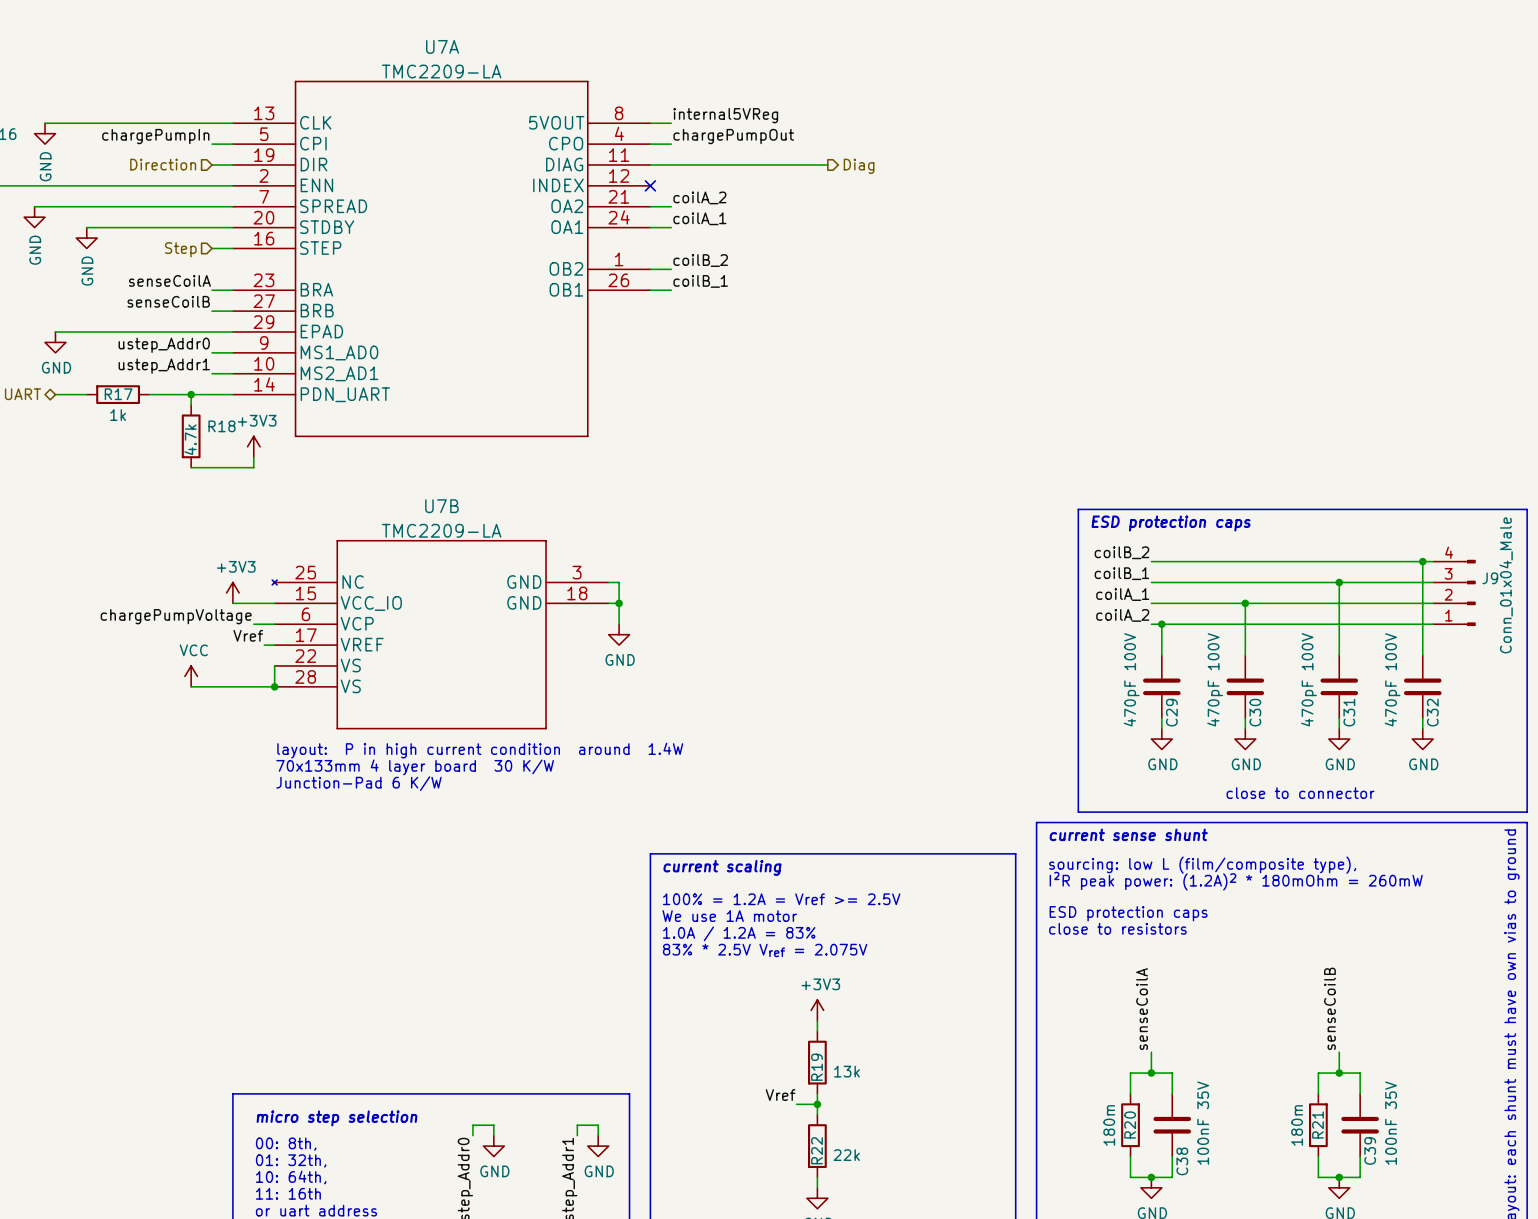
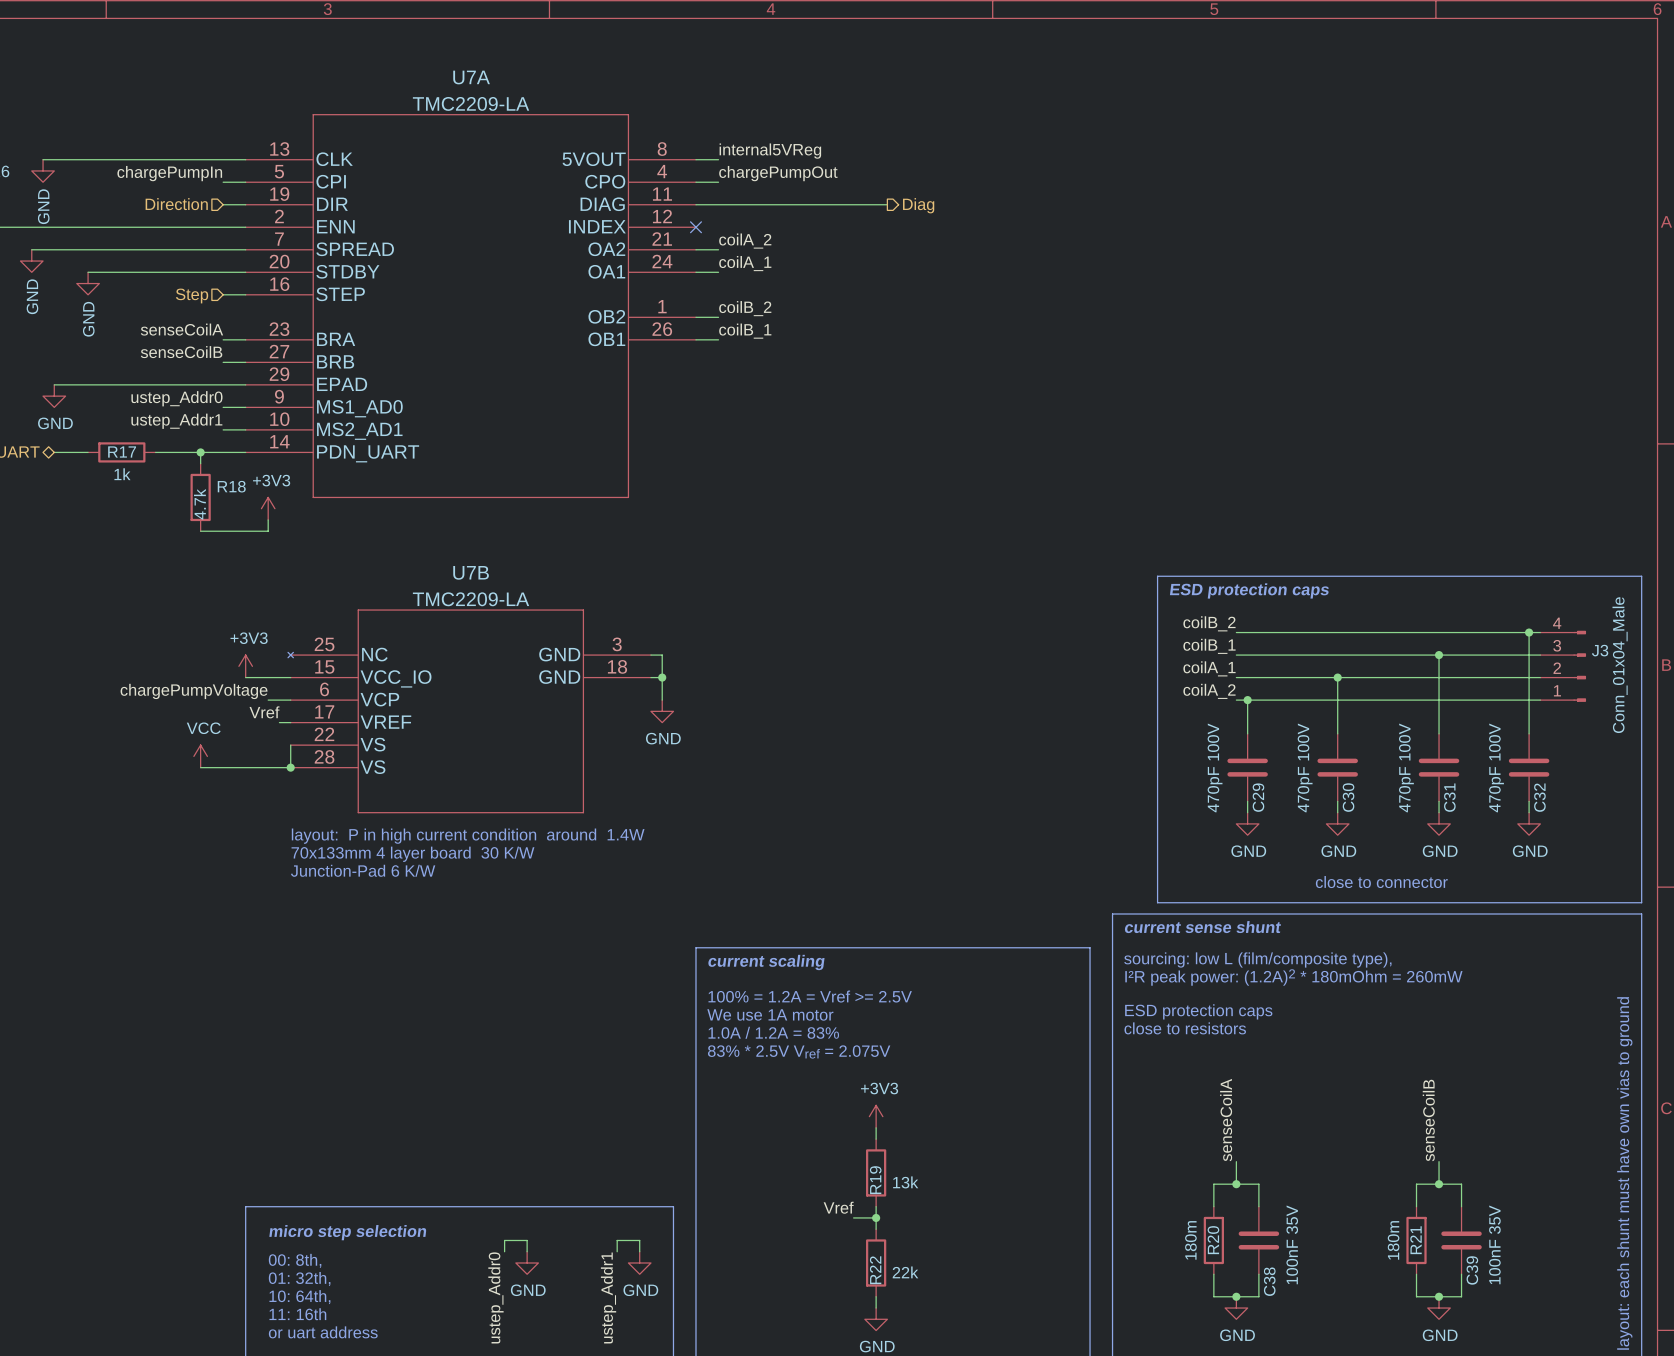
J9 name: J9 (1490, 578) -> J3 (1600, 650)

